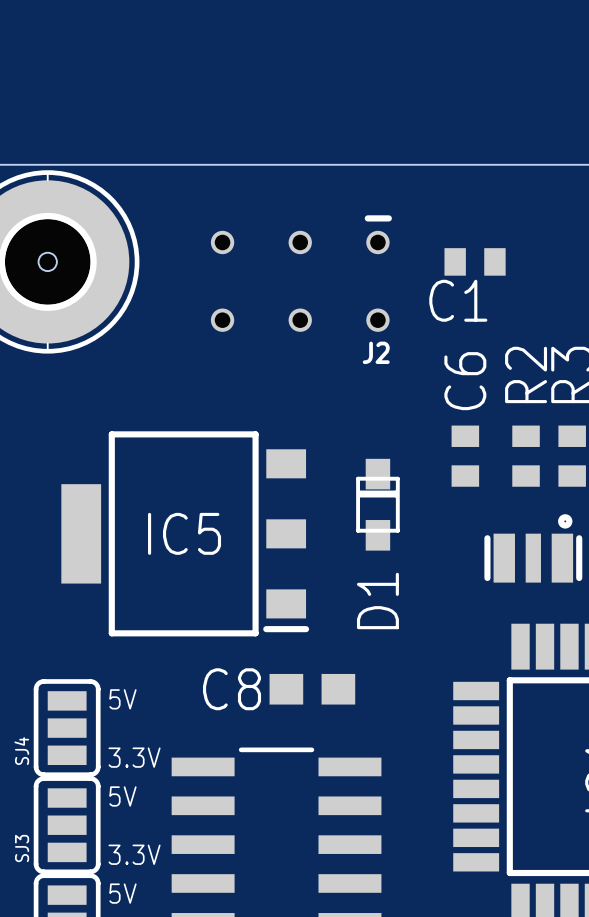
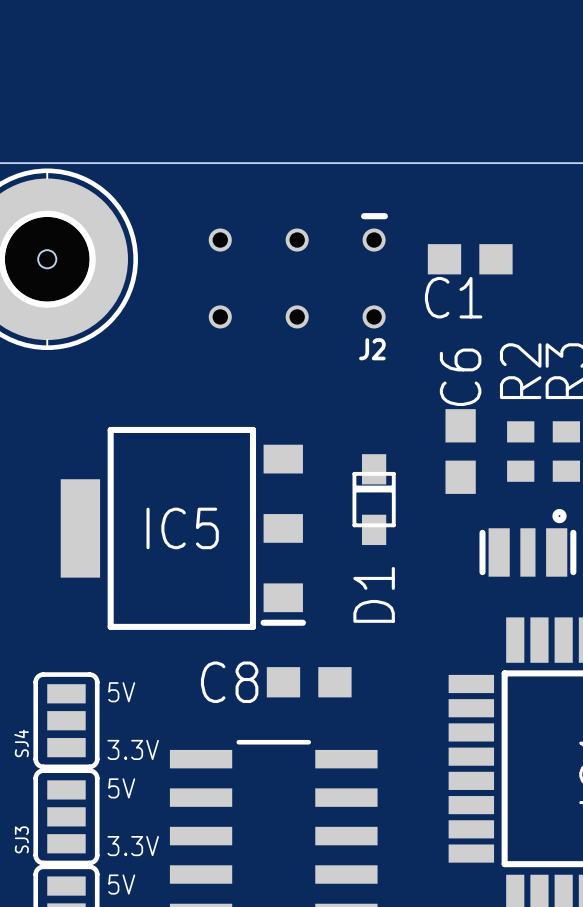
C1 footprint: [444, 248, 506, 276] -> [427, 244, 513, 275]
C6 footprint: [451, 425, 480, 487] -> [445, 409, 476, 494]

